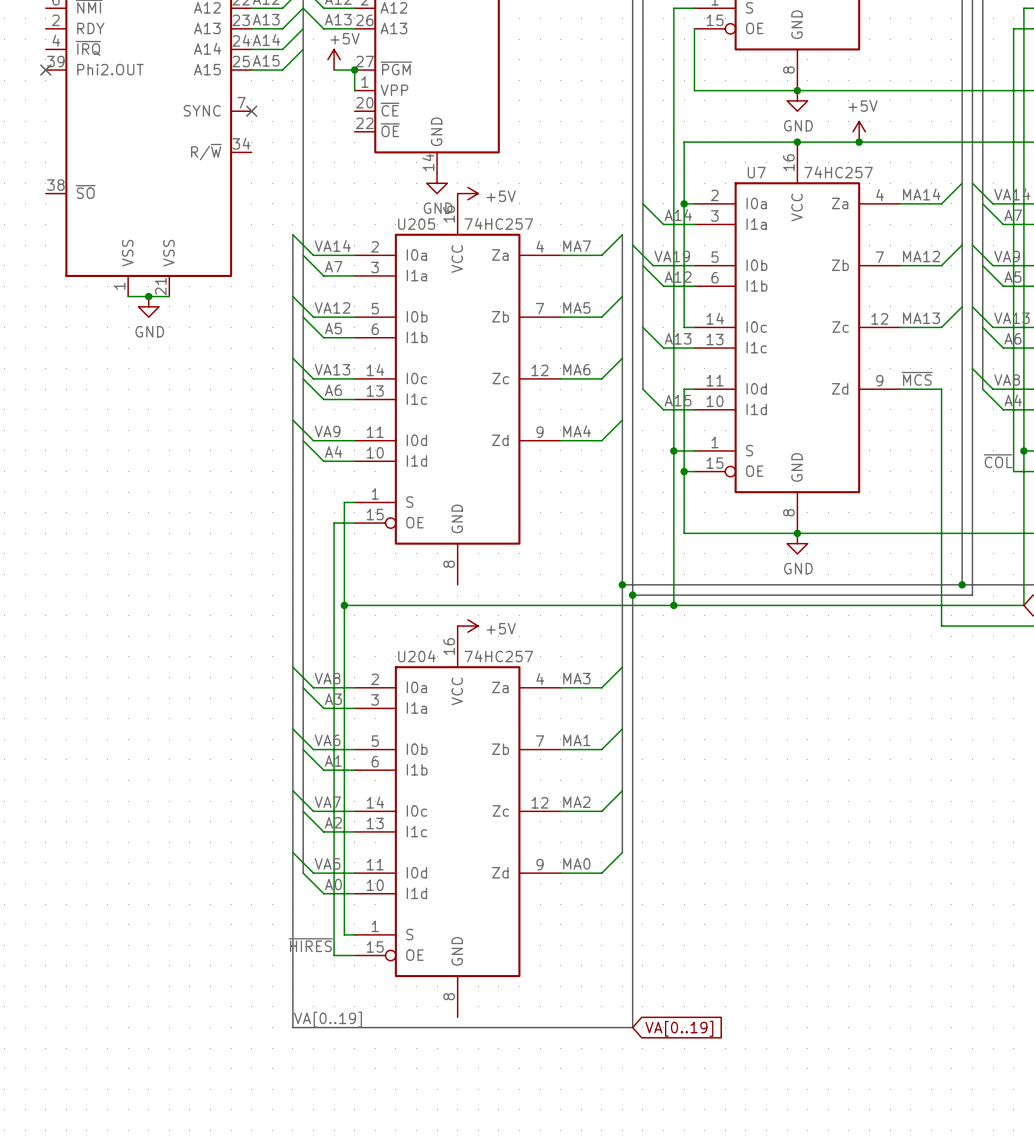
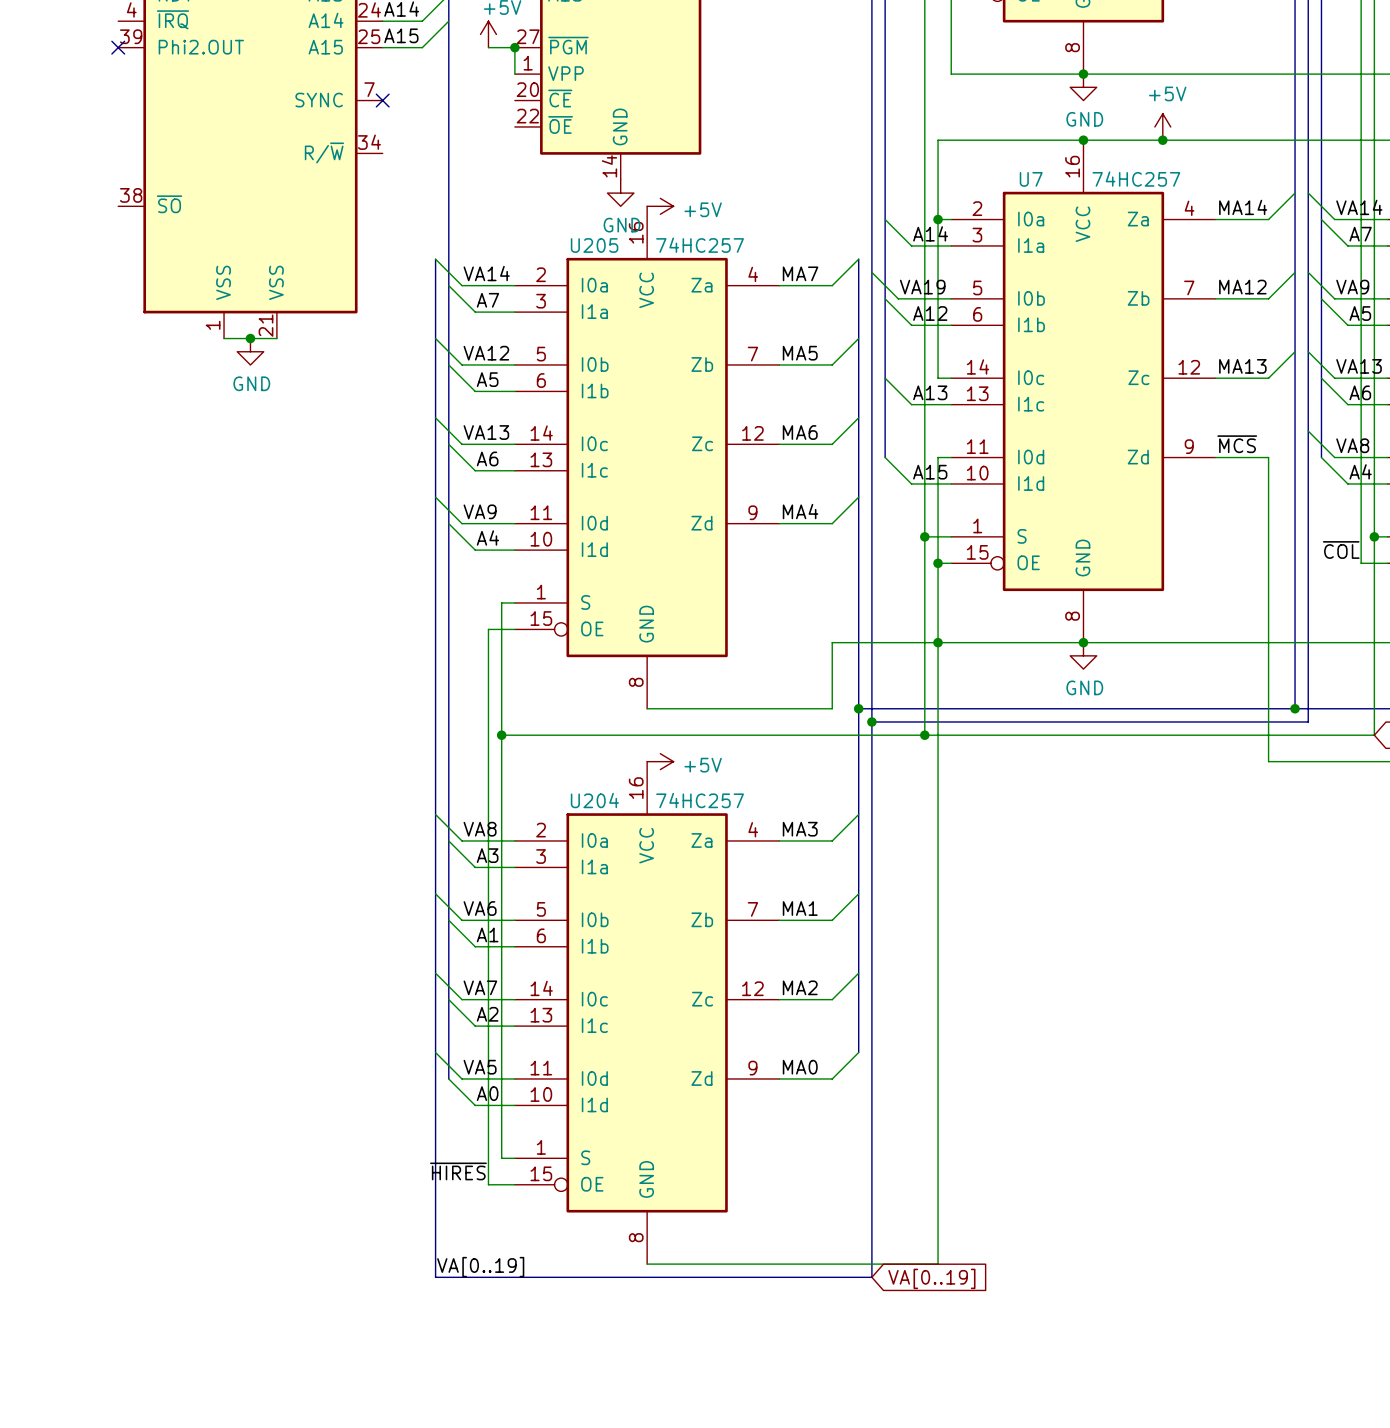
junction: none -> (938, 642)
wire: none -> (647, 708) (832, 708) (832, 642) (938, 642) (938, 1264) (647, 1264)

